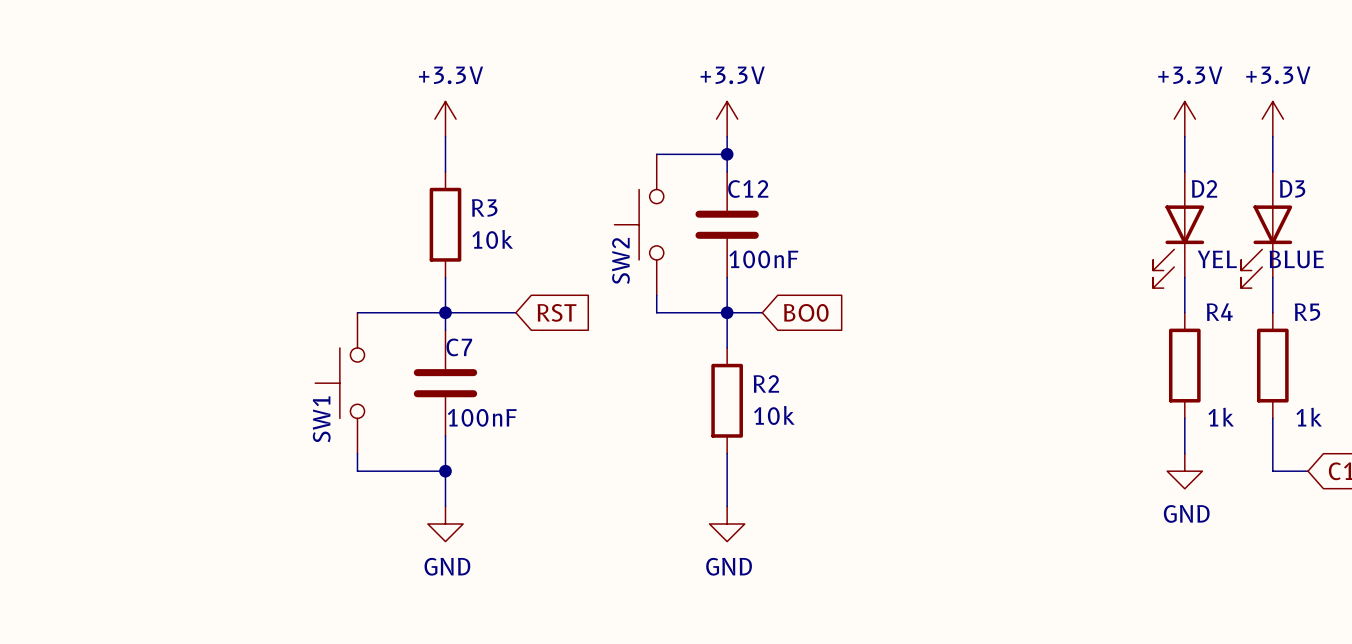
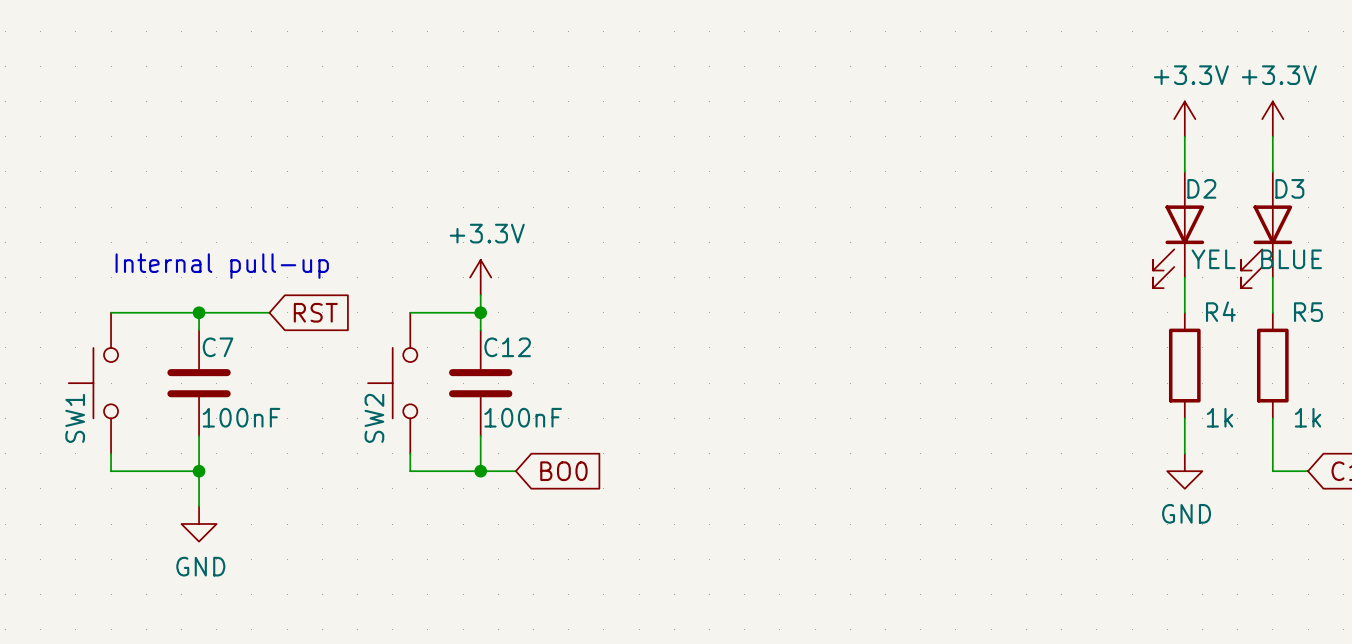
power symbol: +3.3V (445, 119) -> none
power symbol: +3.3V (727, 119) -> none
wire: (445, 136) (445, 171) -> (480, 295) (480, 330)
wire: (727, 136) (727, 171) -> none
wire: (656, 154) (727, 154) -> none
junction: (727, 154) -> none
R3: 10k (445, 224) -> none
SW2 position: (639, 224) -> (392, 383)
C12 position: (727, 224) -> (480, 383)
text: none -> Internal pull-up (222, 266)
wire: (445, 277) (445, 330) -> none
power symbol: none -> +3.3V (480, 277)
wire: (727, 277) (727, 347) -> none
wire: (656, 295) (656, 312) (762, 312) -> none
wire: none -> (111, 312) (269, 312)
wire: none -> (199, 312) (199, 330)
junction: none -> (199, 312)
wire: (357, 312) (410, 312) -> none
junction position: (445, 312) -> (480, 312)
wire: (480, 312) (515, 312) -> none
global label position: RST (556, 312) -> RST (315, 312)
junction: (727, 312) -> none
global label position: BO0 (806, 312) -> BO0 (563, 471)
SW1 position: (339, 383) -> (93, 383)
C7 position: (445, 383) -> (199, 383)
R2: 10k (727, 400) -> none
wire: (445, 435) (445, 506) -> (199, 435) (199, 506)
wire: none -> (480, 435) (480, 471)
wire: none -> (111, 453) (111, 471) (199, 471)
wire: (357, 453) (357, 471) (410, 471) -> (410, 453) (410, 471)
wire: (727, 453) (727, 506) -> none
junction: none -> (199, 471)
wire: none -> (445, 471) (515, 471)
junction position: (445, 471) -> (480, 471)
power symbol position: GND (445, 524) -> GND (199, 524)
power symbol: GND (727, 524) -> none

